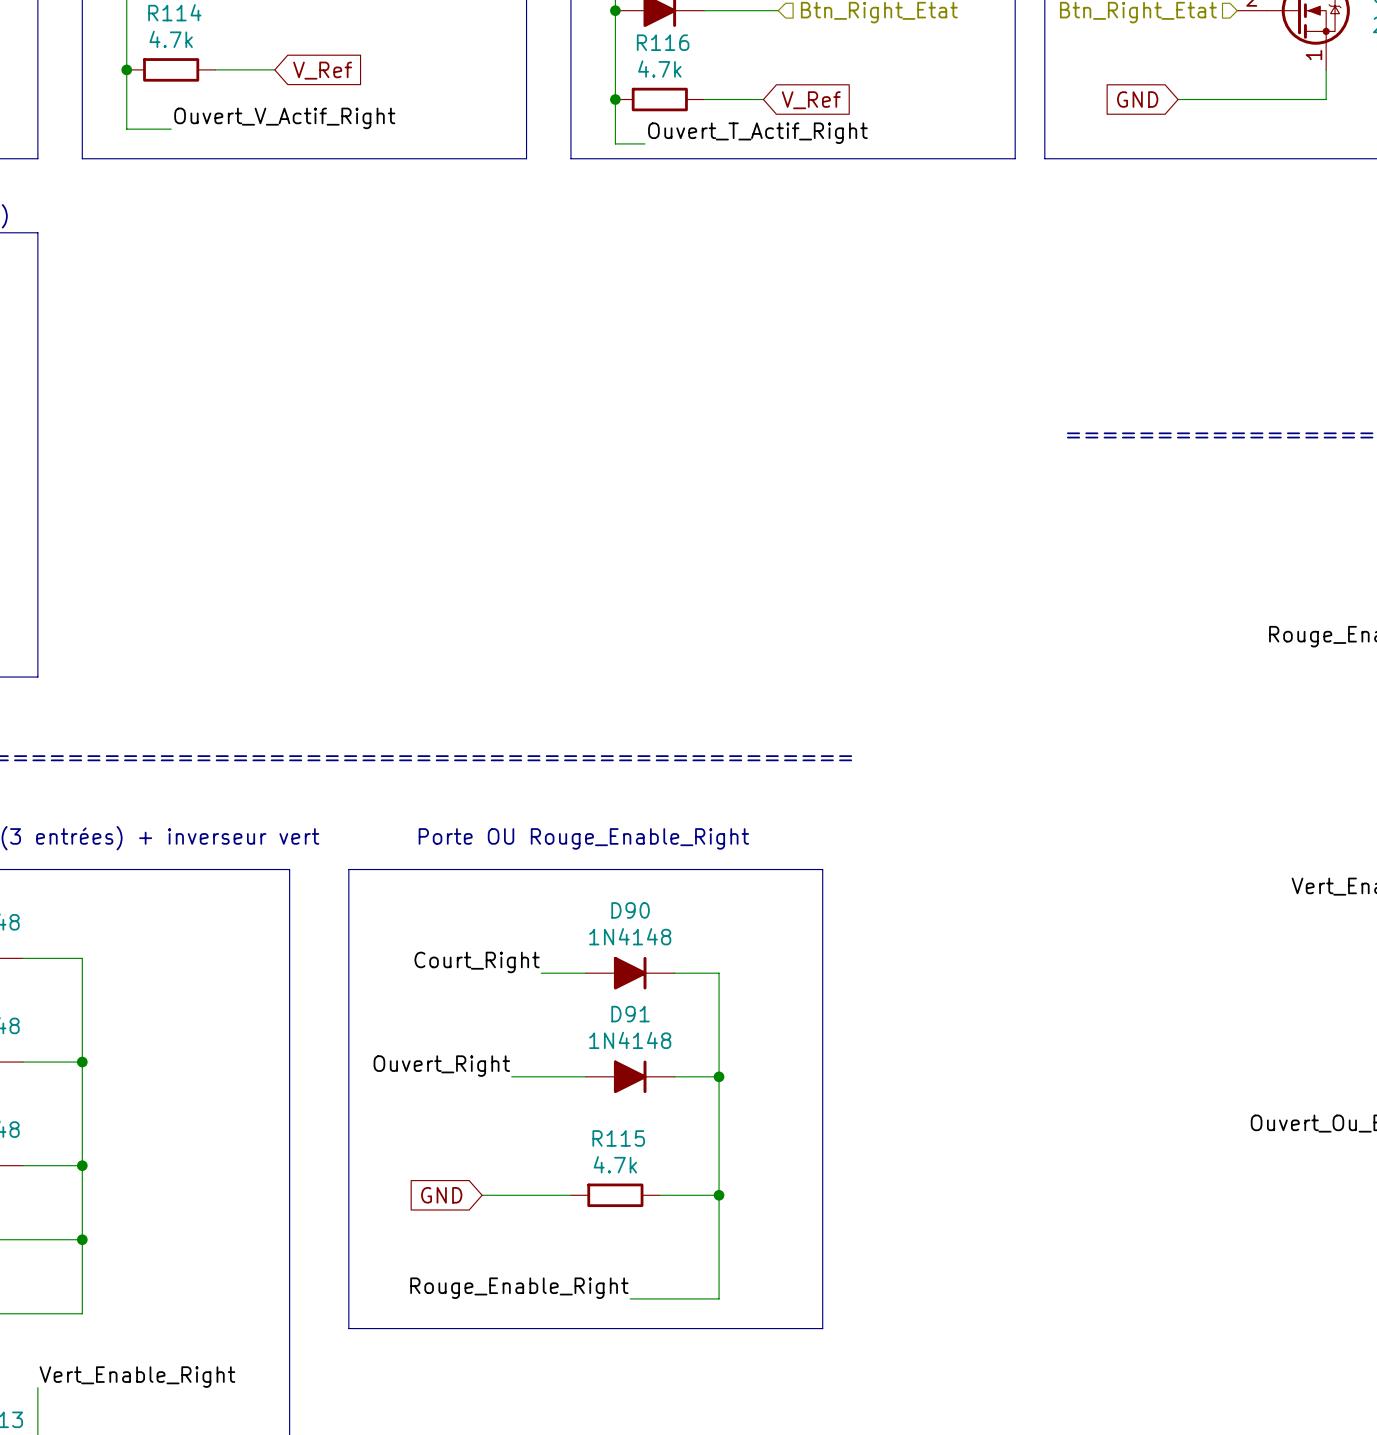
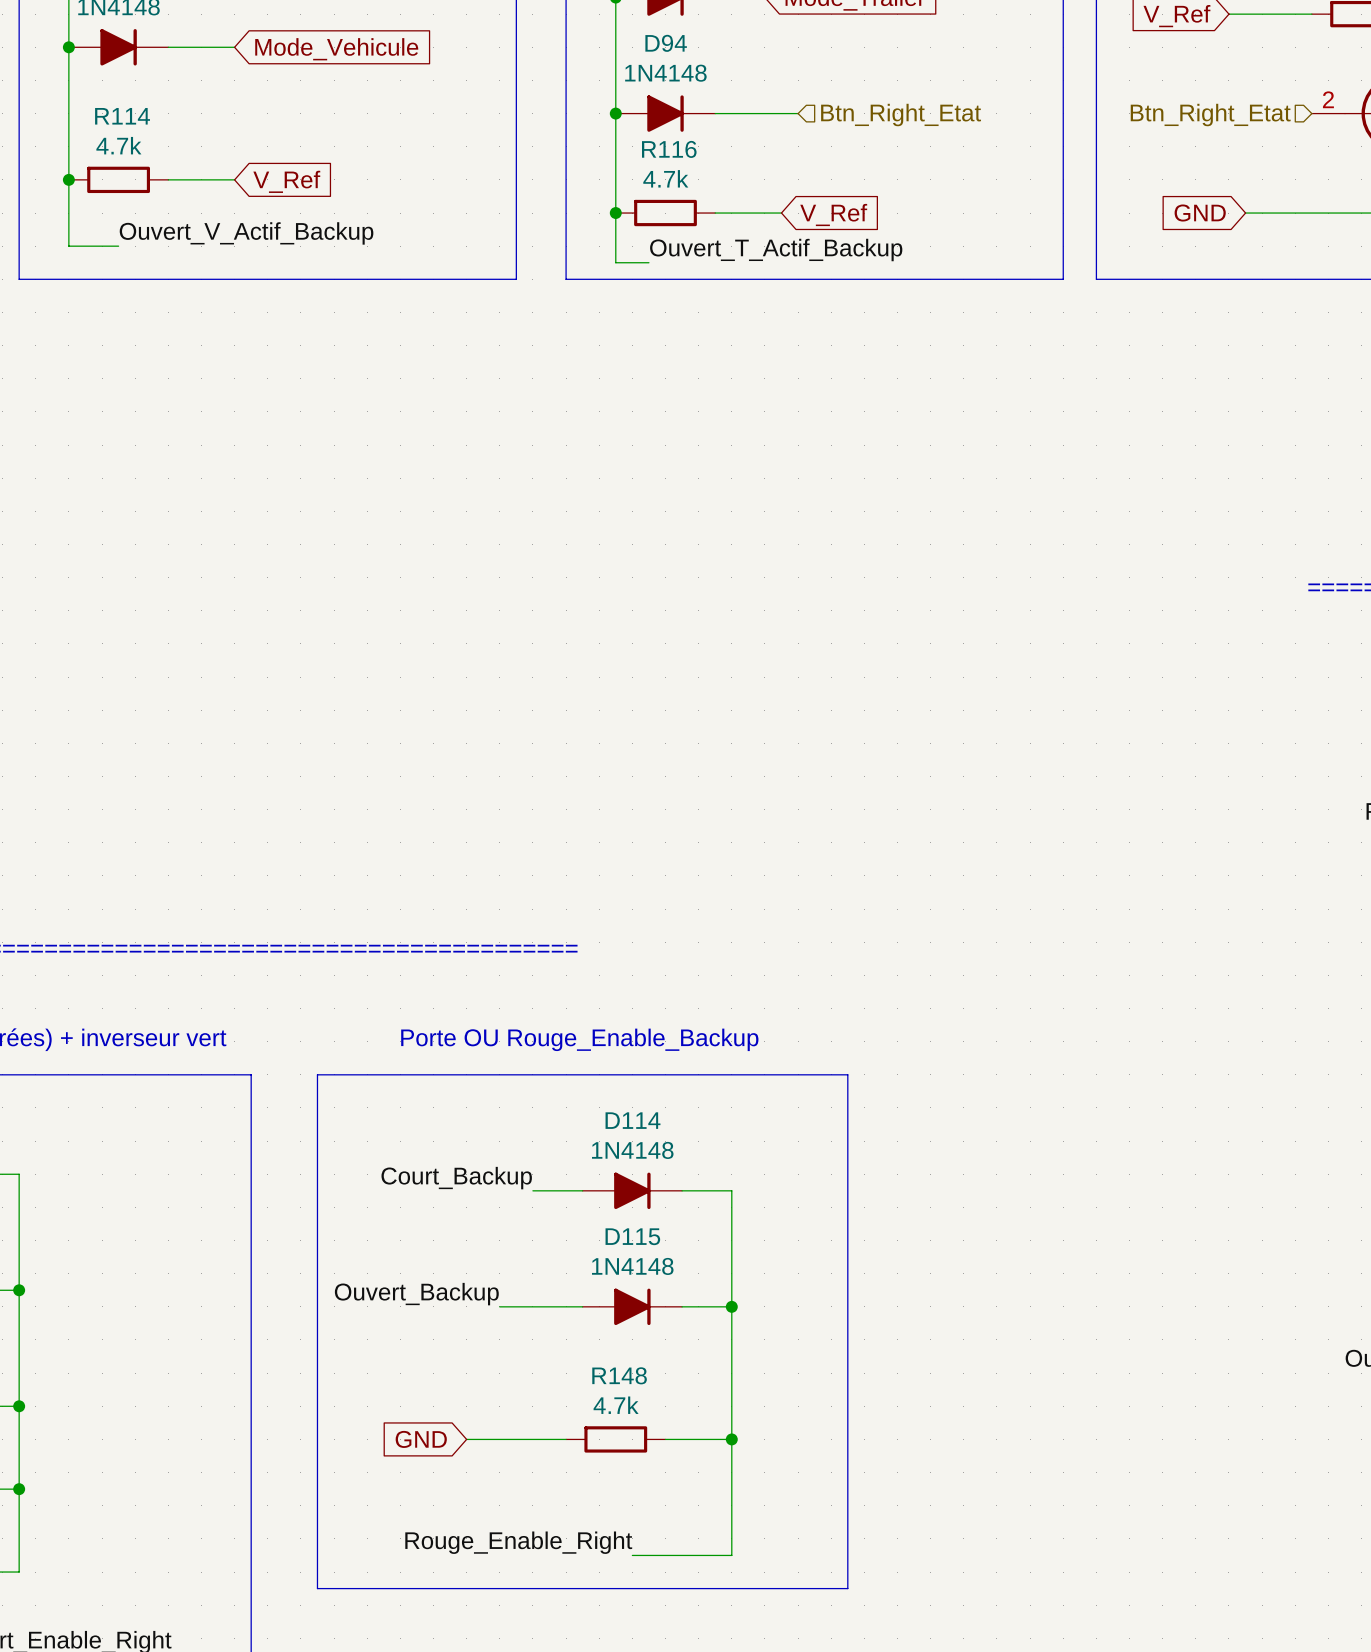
label: Ouvert_V_Actif_Right (284, 118) -> Ouvert_V_Actif_Backup (246, 233)
label: Ouvert_T_Actif_Right (757, 133) -> Ouvert_T_Actif_Backup (776, 250)
text: Porte OU Rouge_Enable_Right (583, 838) -> Porte OU Rouge_Enable_Backup (579, 1039)
D90 name: D90 (630, 910) -> D114 (632, 1120)
label: Court_Right (477, 962) -> Court_Backup (456, 1178)
D91 name: D91 (630, 1014) -> D115 (632, 1236)
label: Ouvert_Right (441, 1066) -> Ouvert_Backup (416, 1294)
R115 name: R115 (618, 1138) -> R148 (619, 1375)

